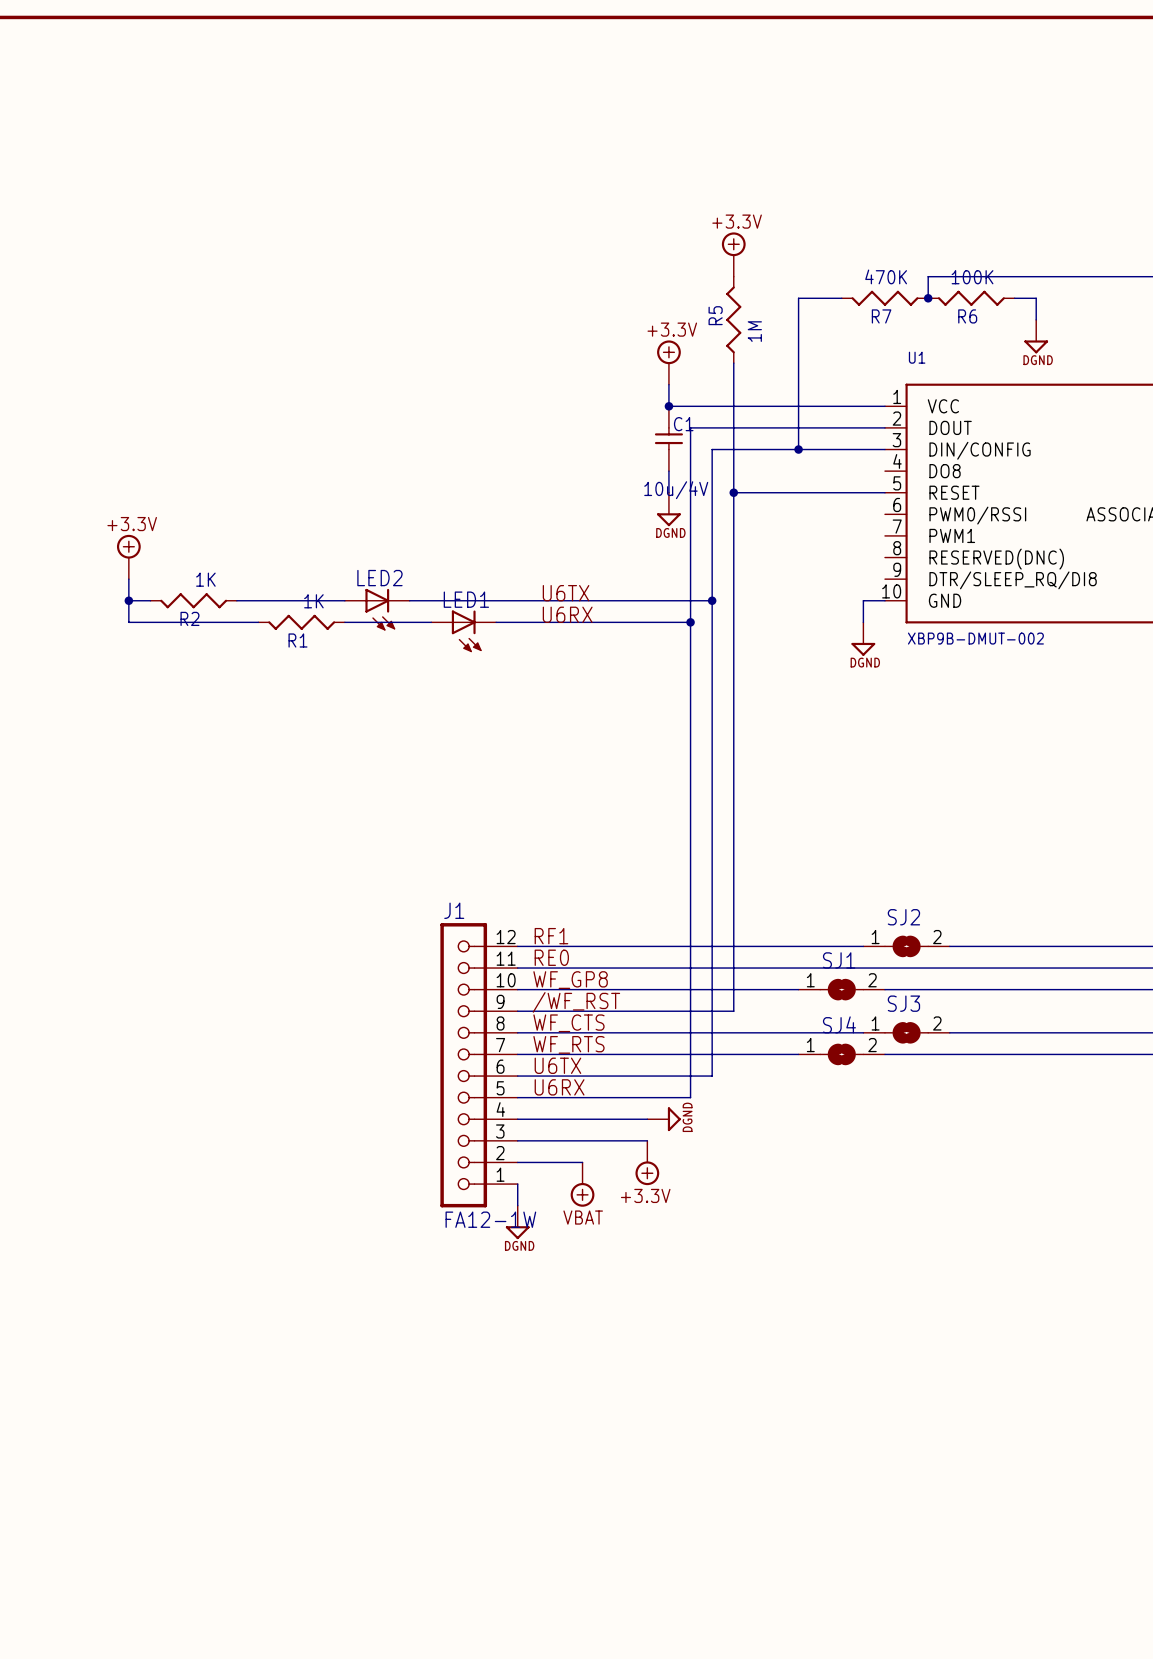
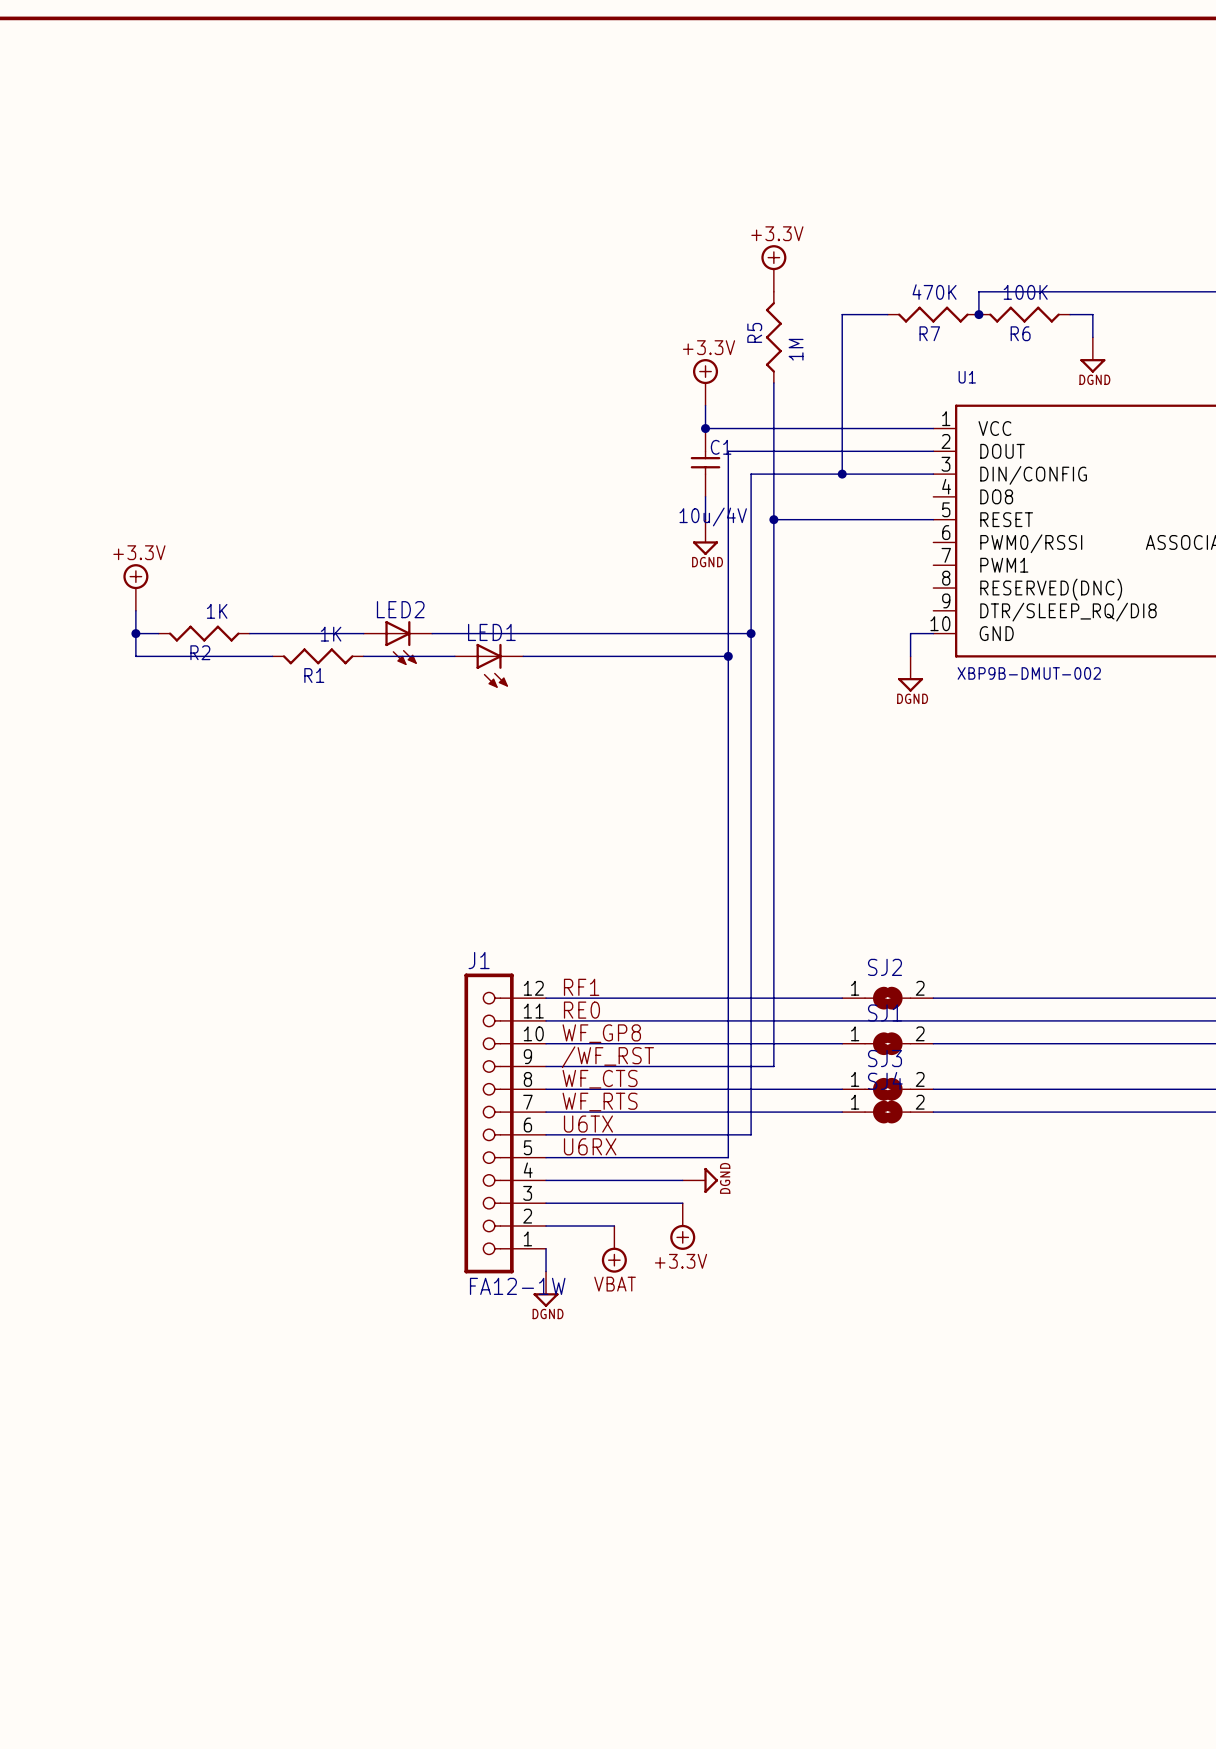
label: U6TX (566, 593) -> none
label: U6RX (567, 614) -> none
SJ2 position: (906, 946) -> (887, 998)
SJ3 position: (906, 1032) -> (887, 1089)

